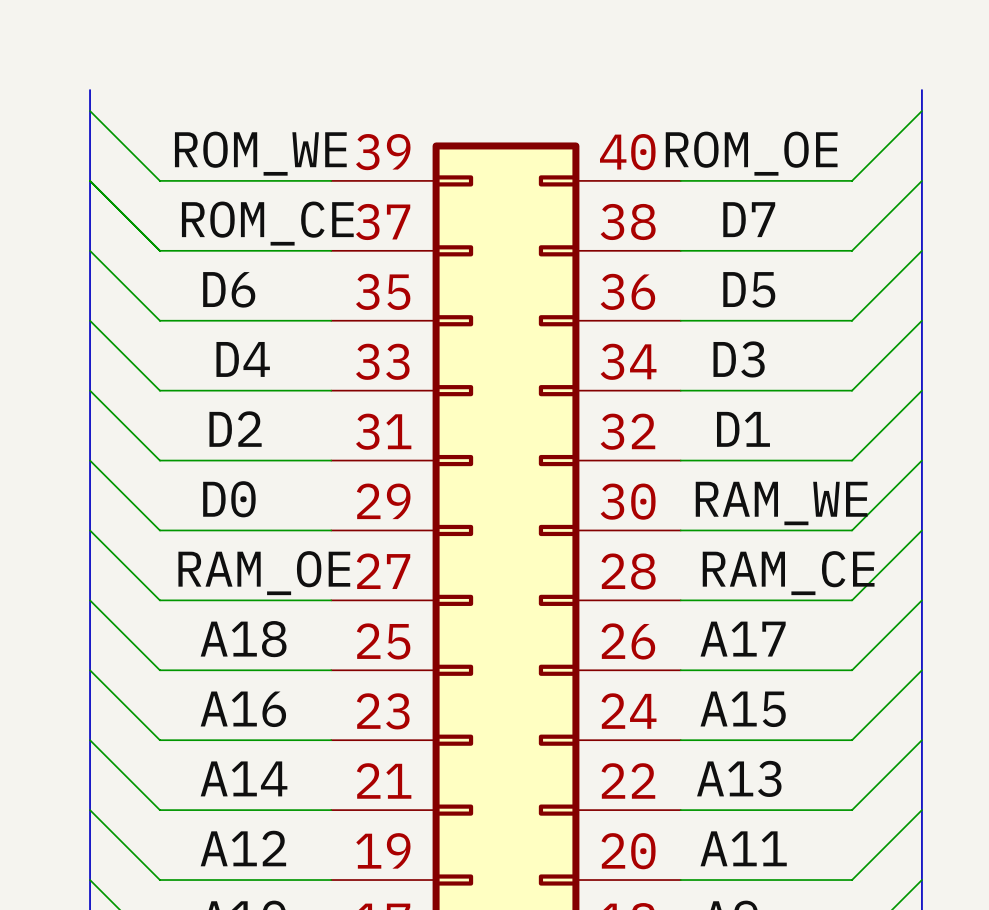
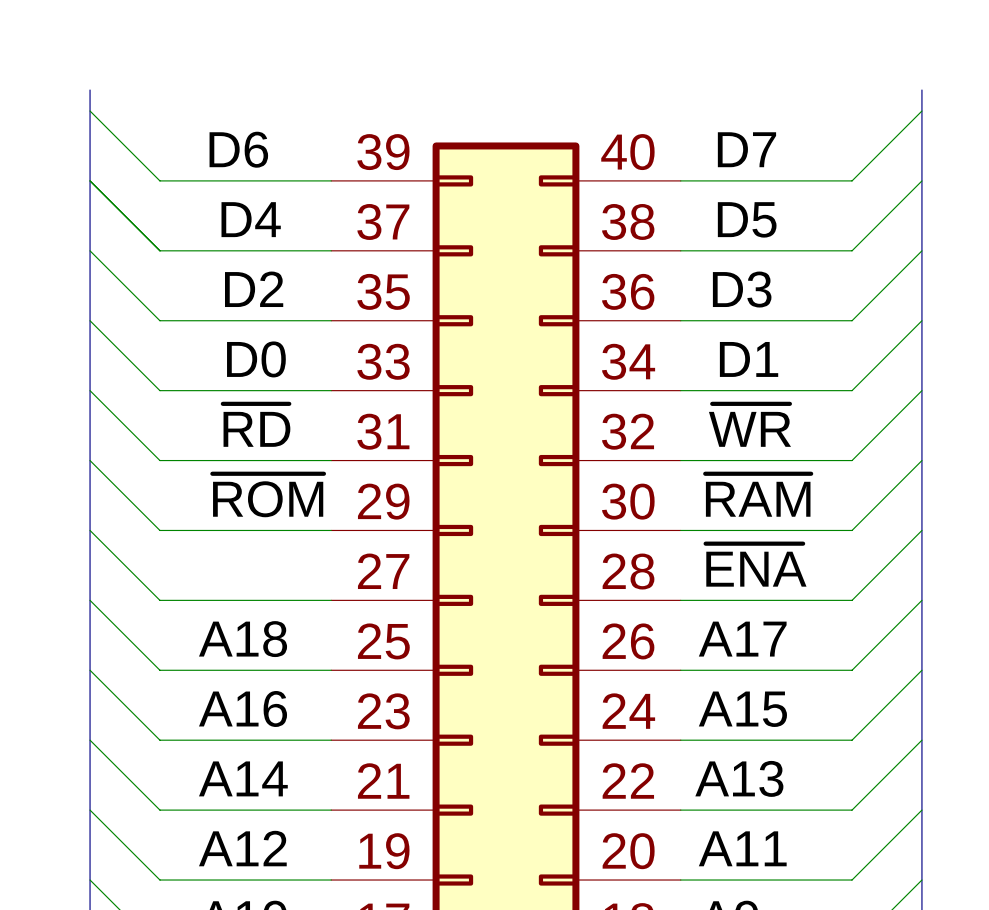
label: none -> D7 (746, 149)
label: ROM_WE (260, 153) -> none
label: ROM_OE (751, 153) -> none
label: D7 (749, 219) -> D5 (747, 219)
label: ROM_CE (267, 223) -> none
label position: D6 (229, 289) -> D6 (238, 149)
label: D5 (749, 289) -> none
label position: D4 (243, 359) -> D4 (251, 219)
label position: D3 (739, 359) -> D3 (742, 289)
label: none -> ~{RD} (256, 425)
label: none -> ~{WR} (749, 425)
label position: D2 (235, 429) -> D2 (254, 289)
label position: D1 (743, 429) -> D1 (749, 359)
label: none -> ~{ROM} (268, 495)
label position: D0 (229, 499) -> D0 (256, 359)
label: RAM_WE (781, 503) -> ~{RAM} (758, 495)
label: none -> ~{ENA} (756, 565)
label: RAM_OE (264, 573) -> none
label: RAM_CE (788, 573) -> none

